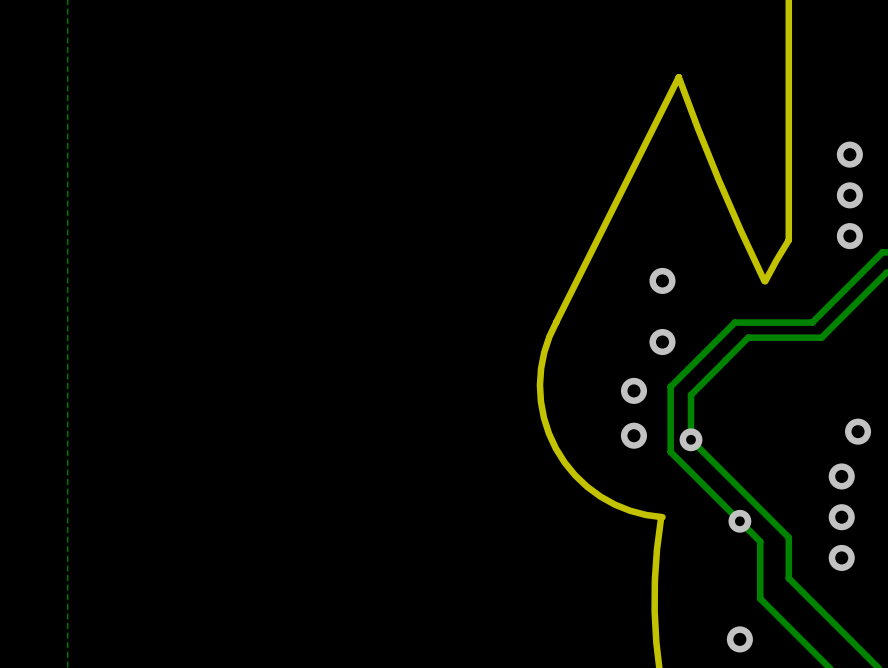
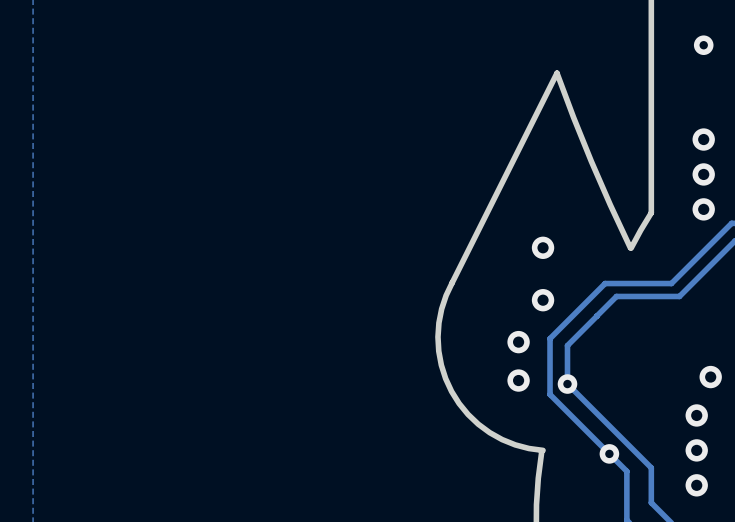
via: none -> (703, 45)

